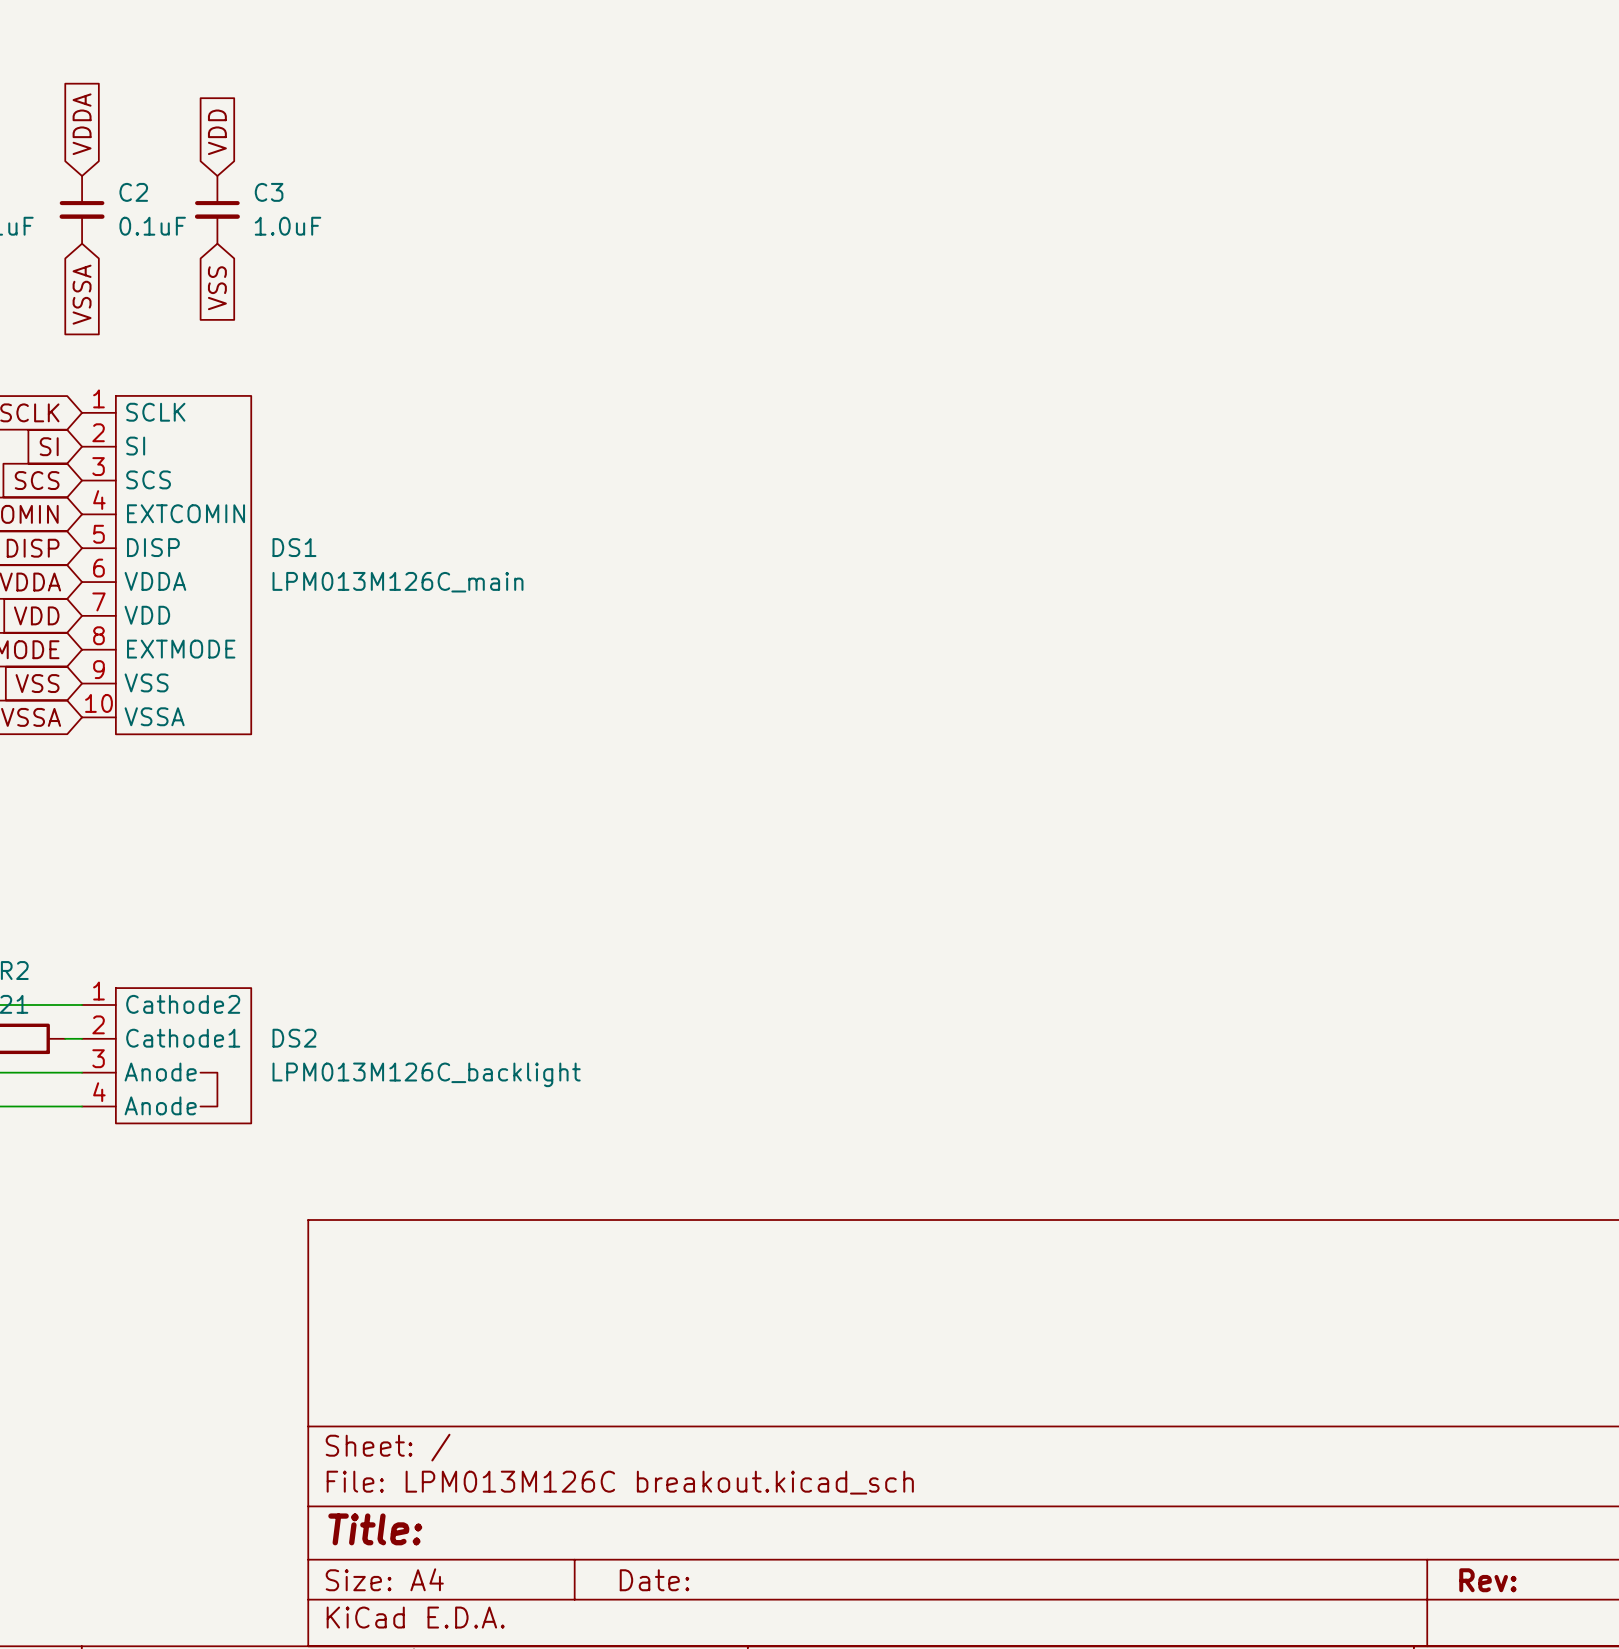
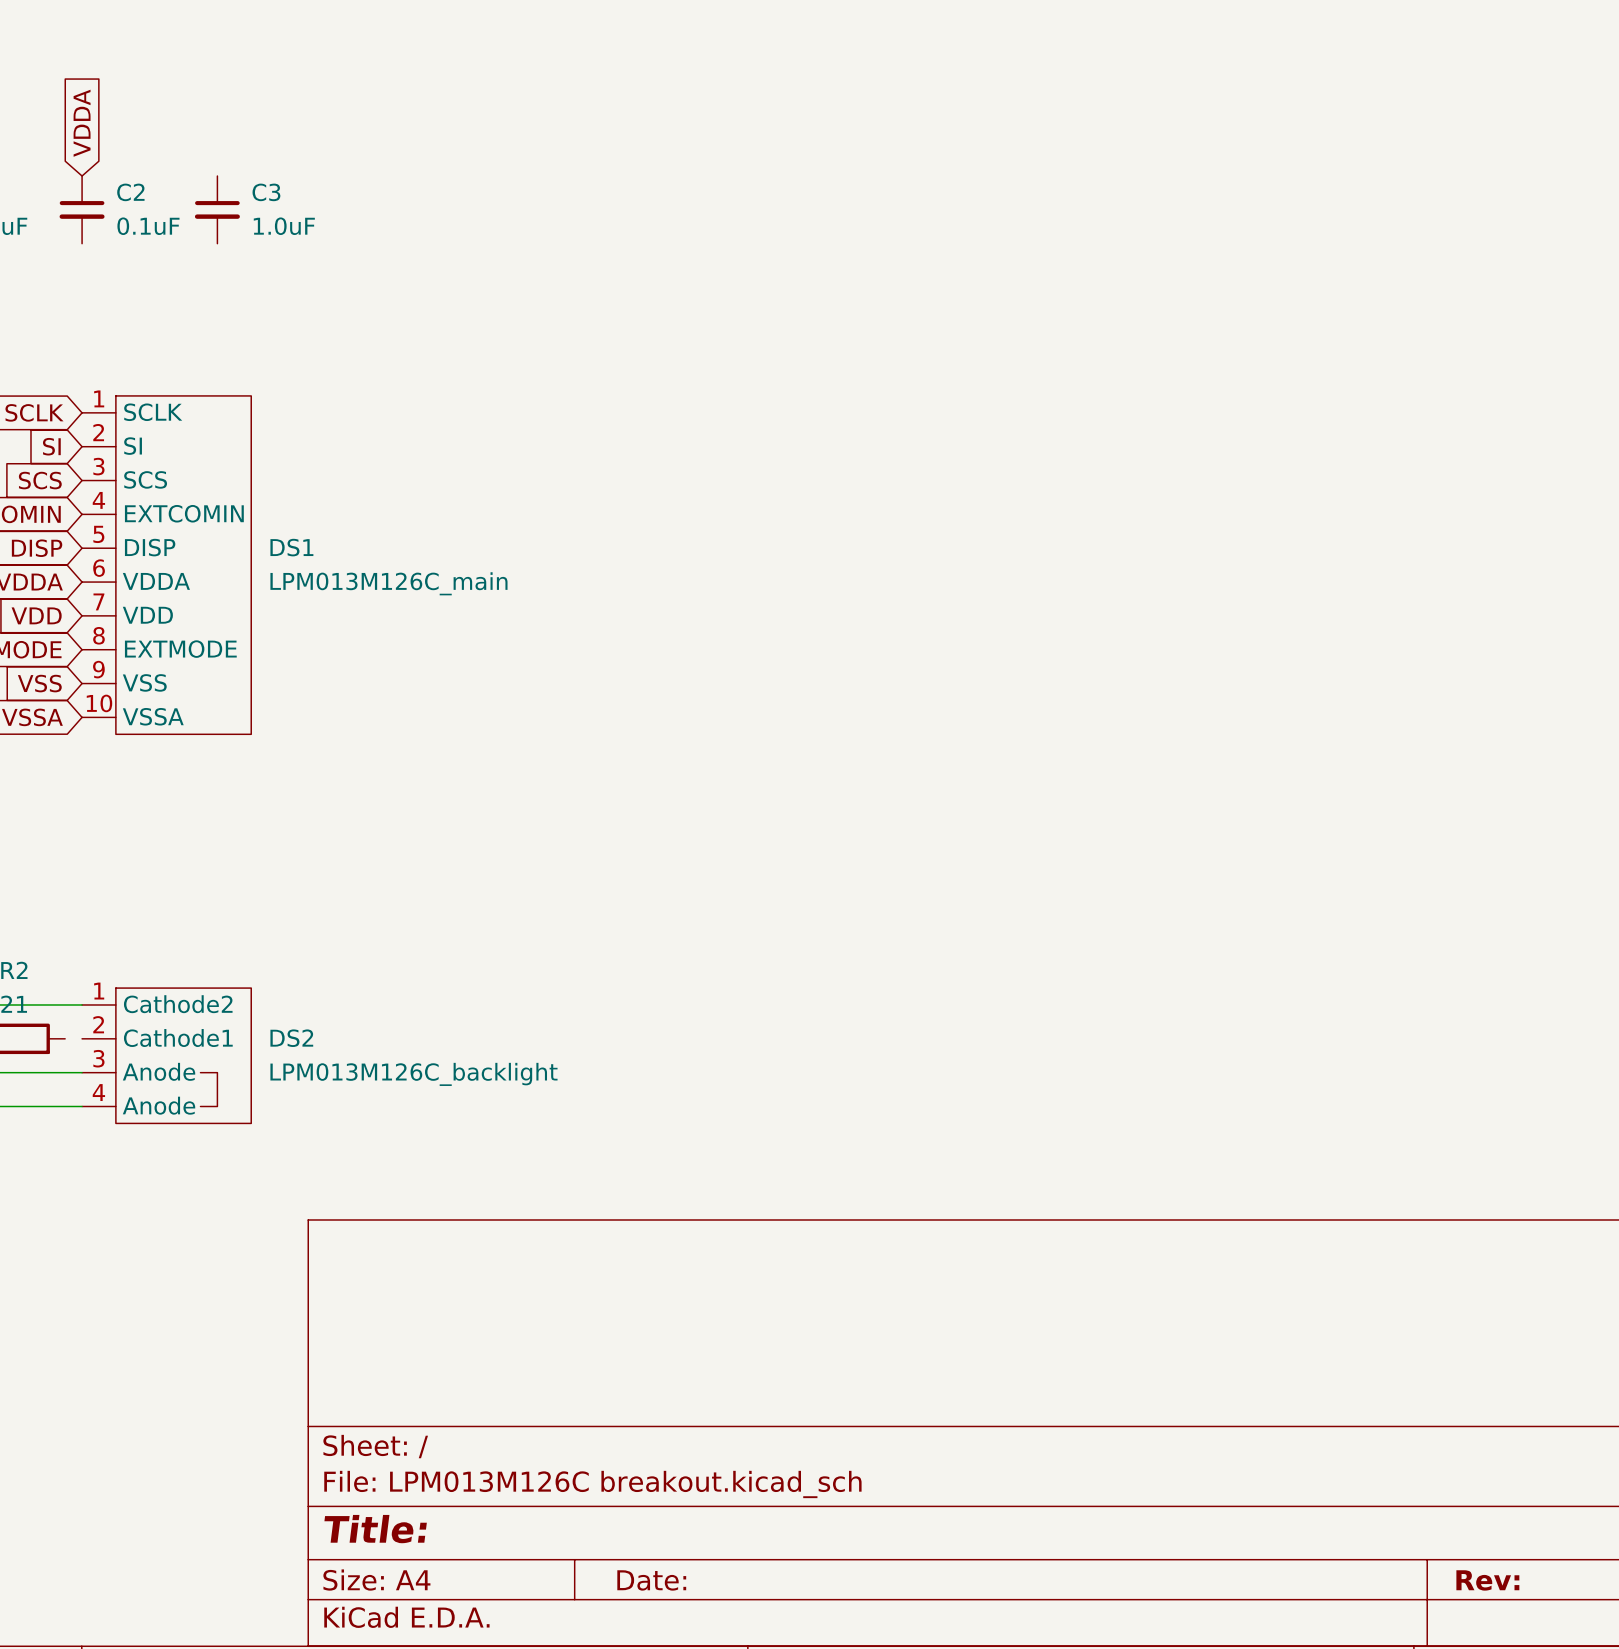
global label: VDD (217, 132) -> none
global label: VSS (217, 288) -> none
global label: VSSA (82, 294) -> none
wire: (65, 1038) (82, 1038) -> none

